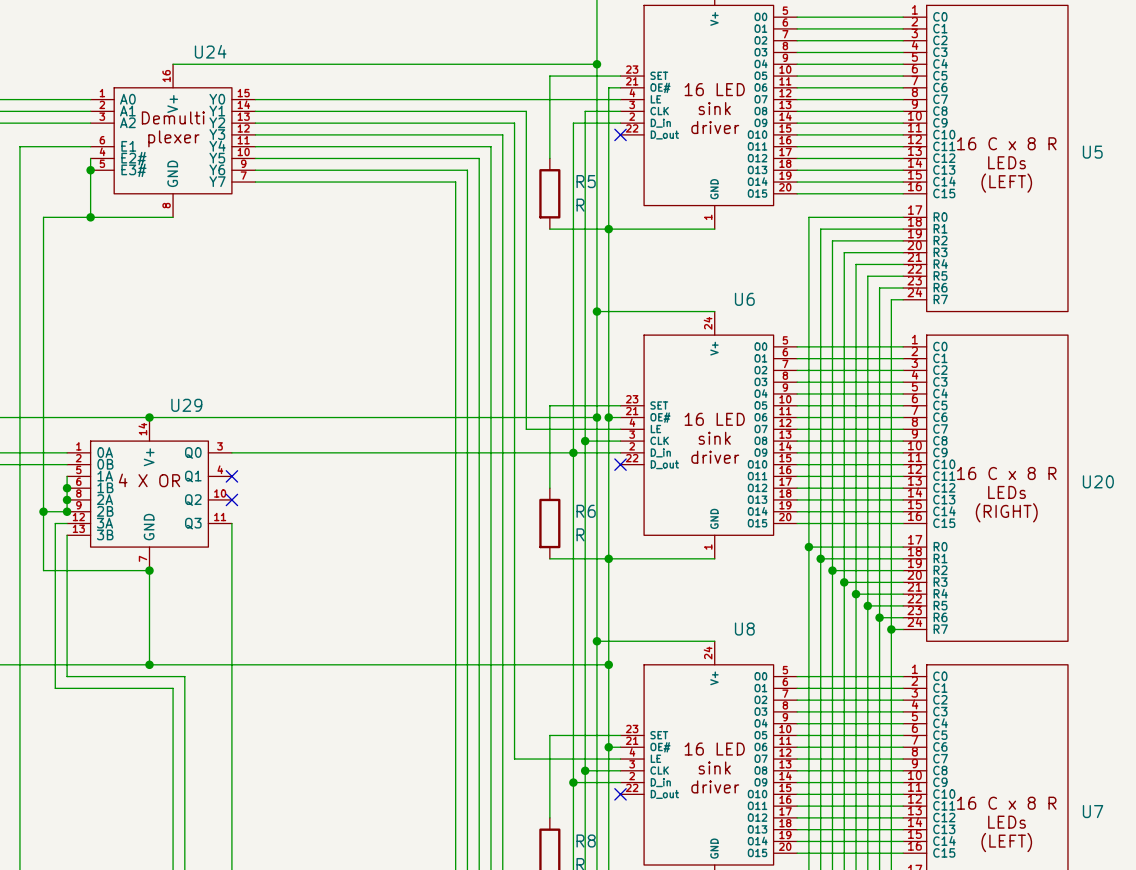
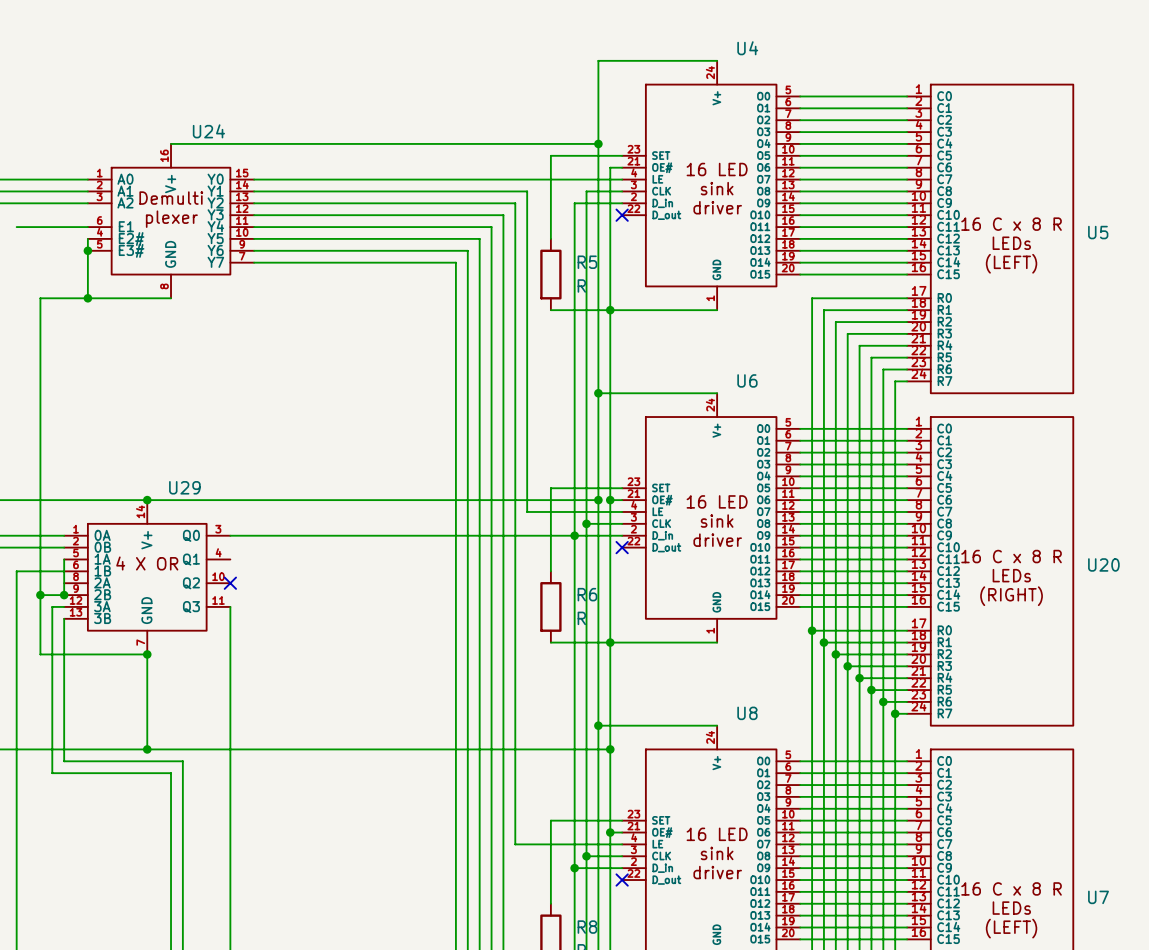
wire: (19, 146) (19, 488) -> (64, 571) (16, 571)
no-connect mark: (231, 476) -> none
junction: (67, 488) -> none
junction: (67, 499) -> none

